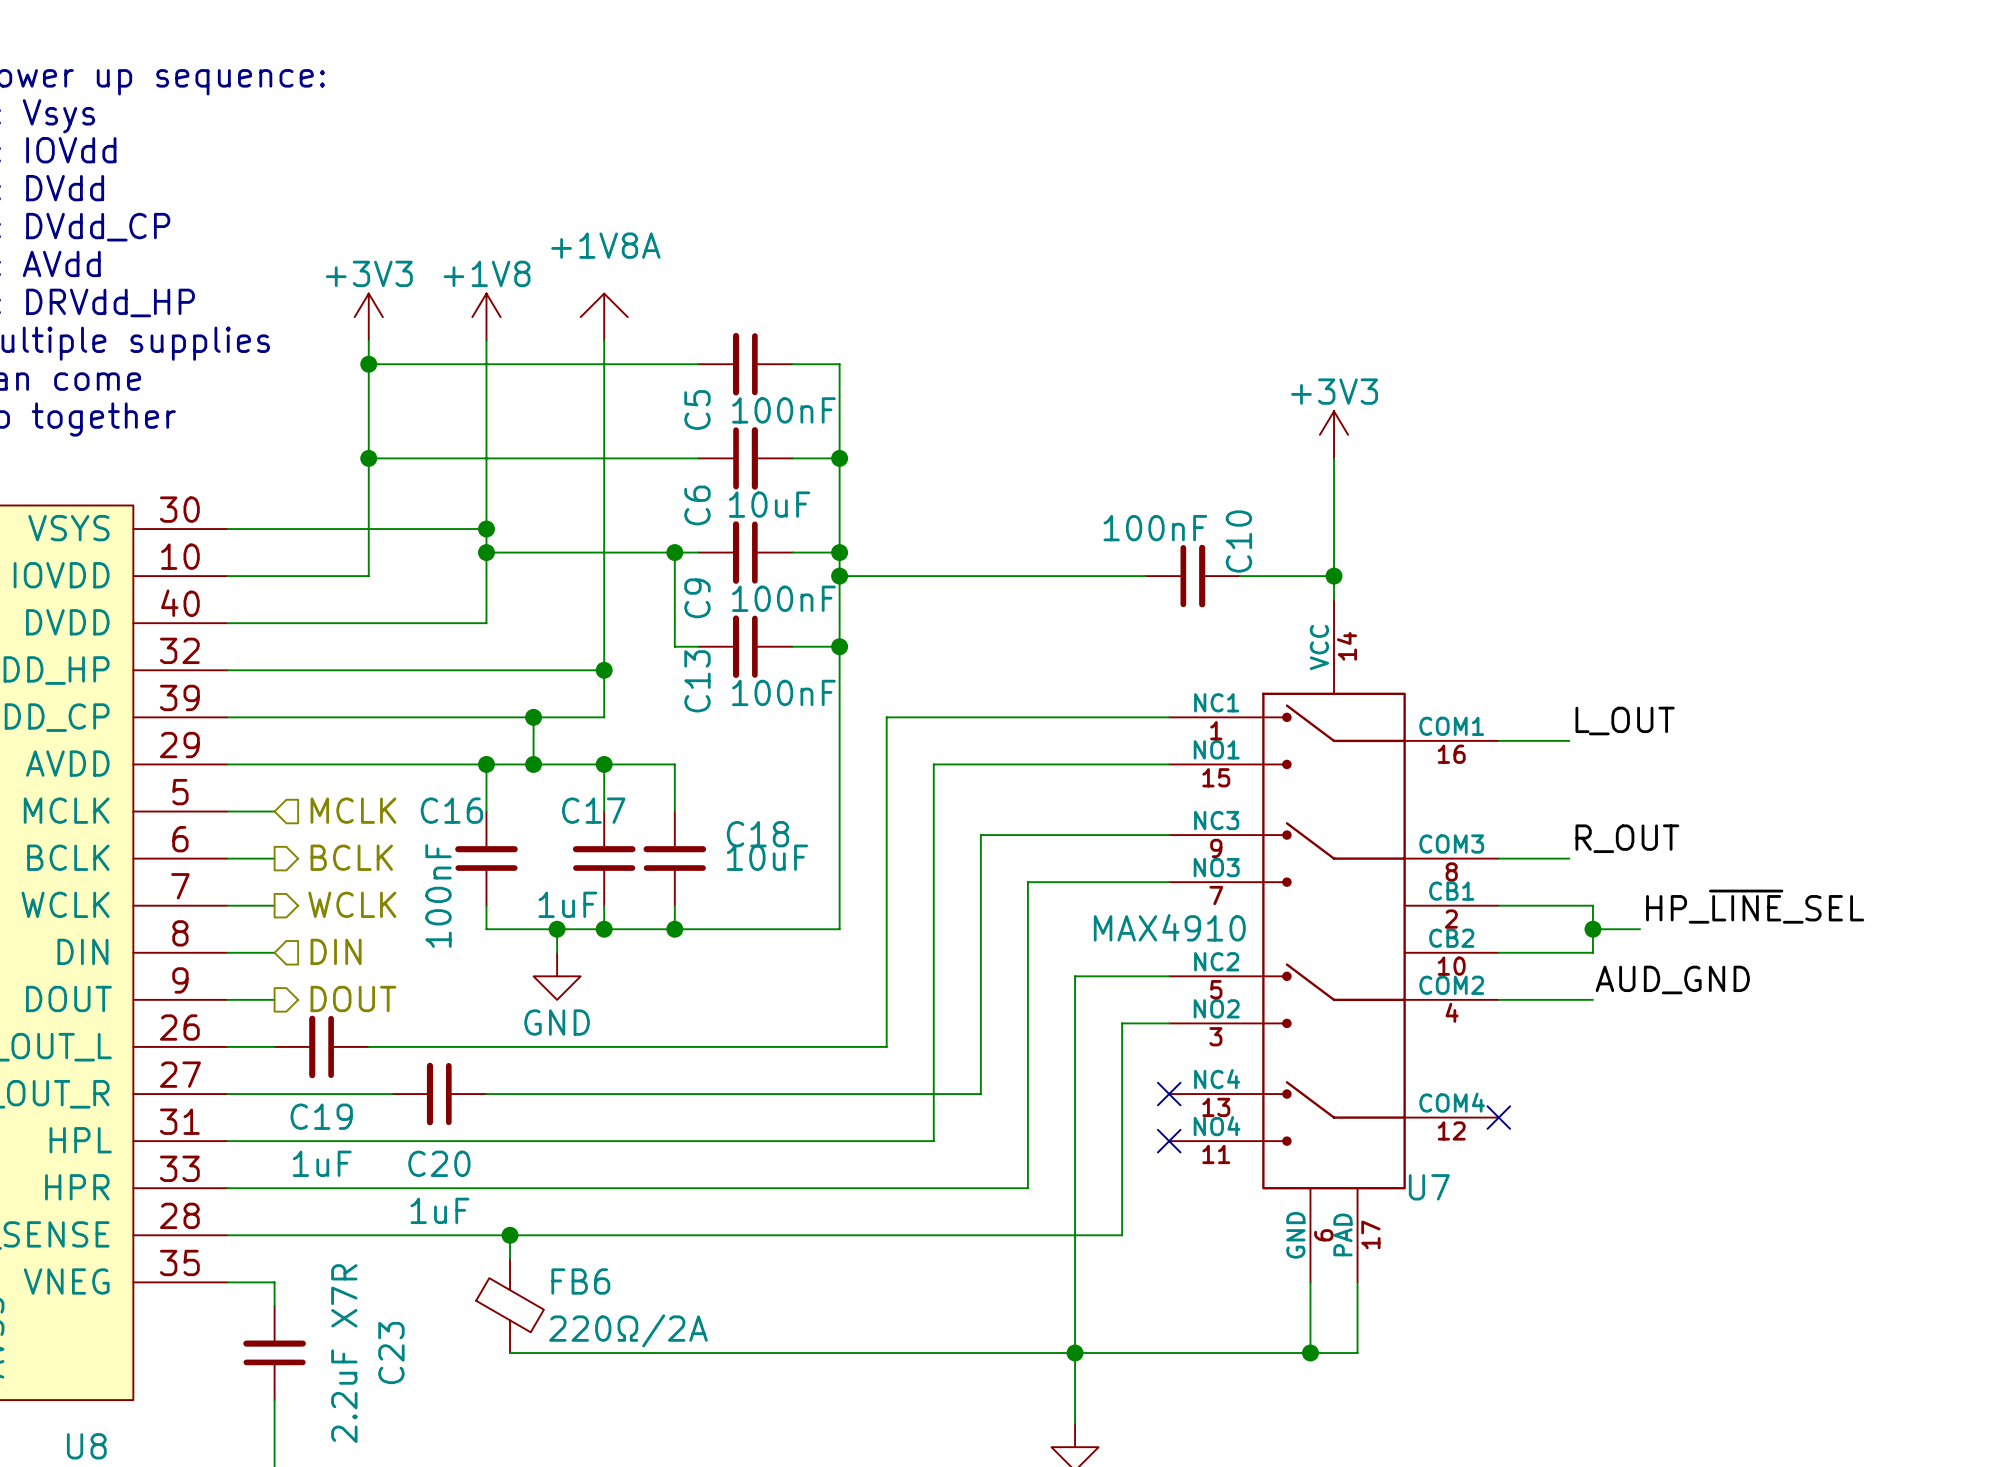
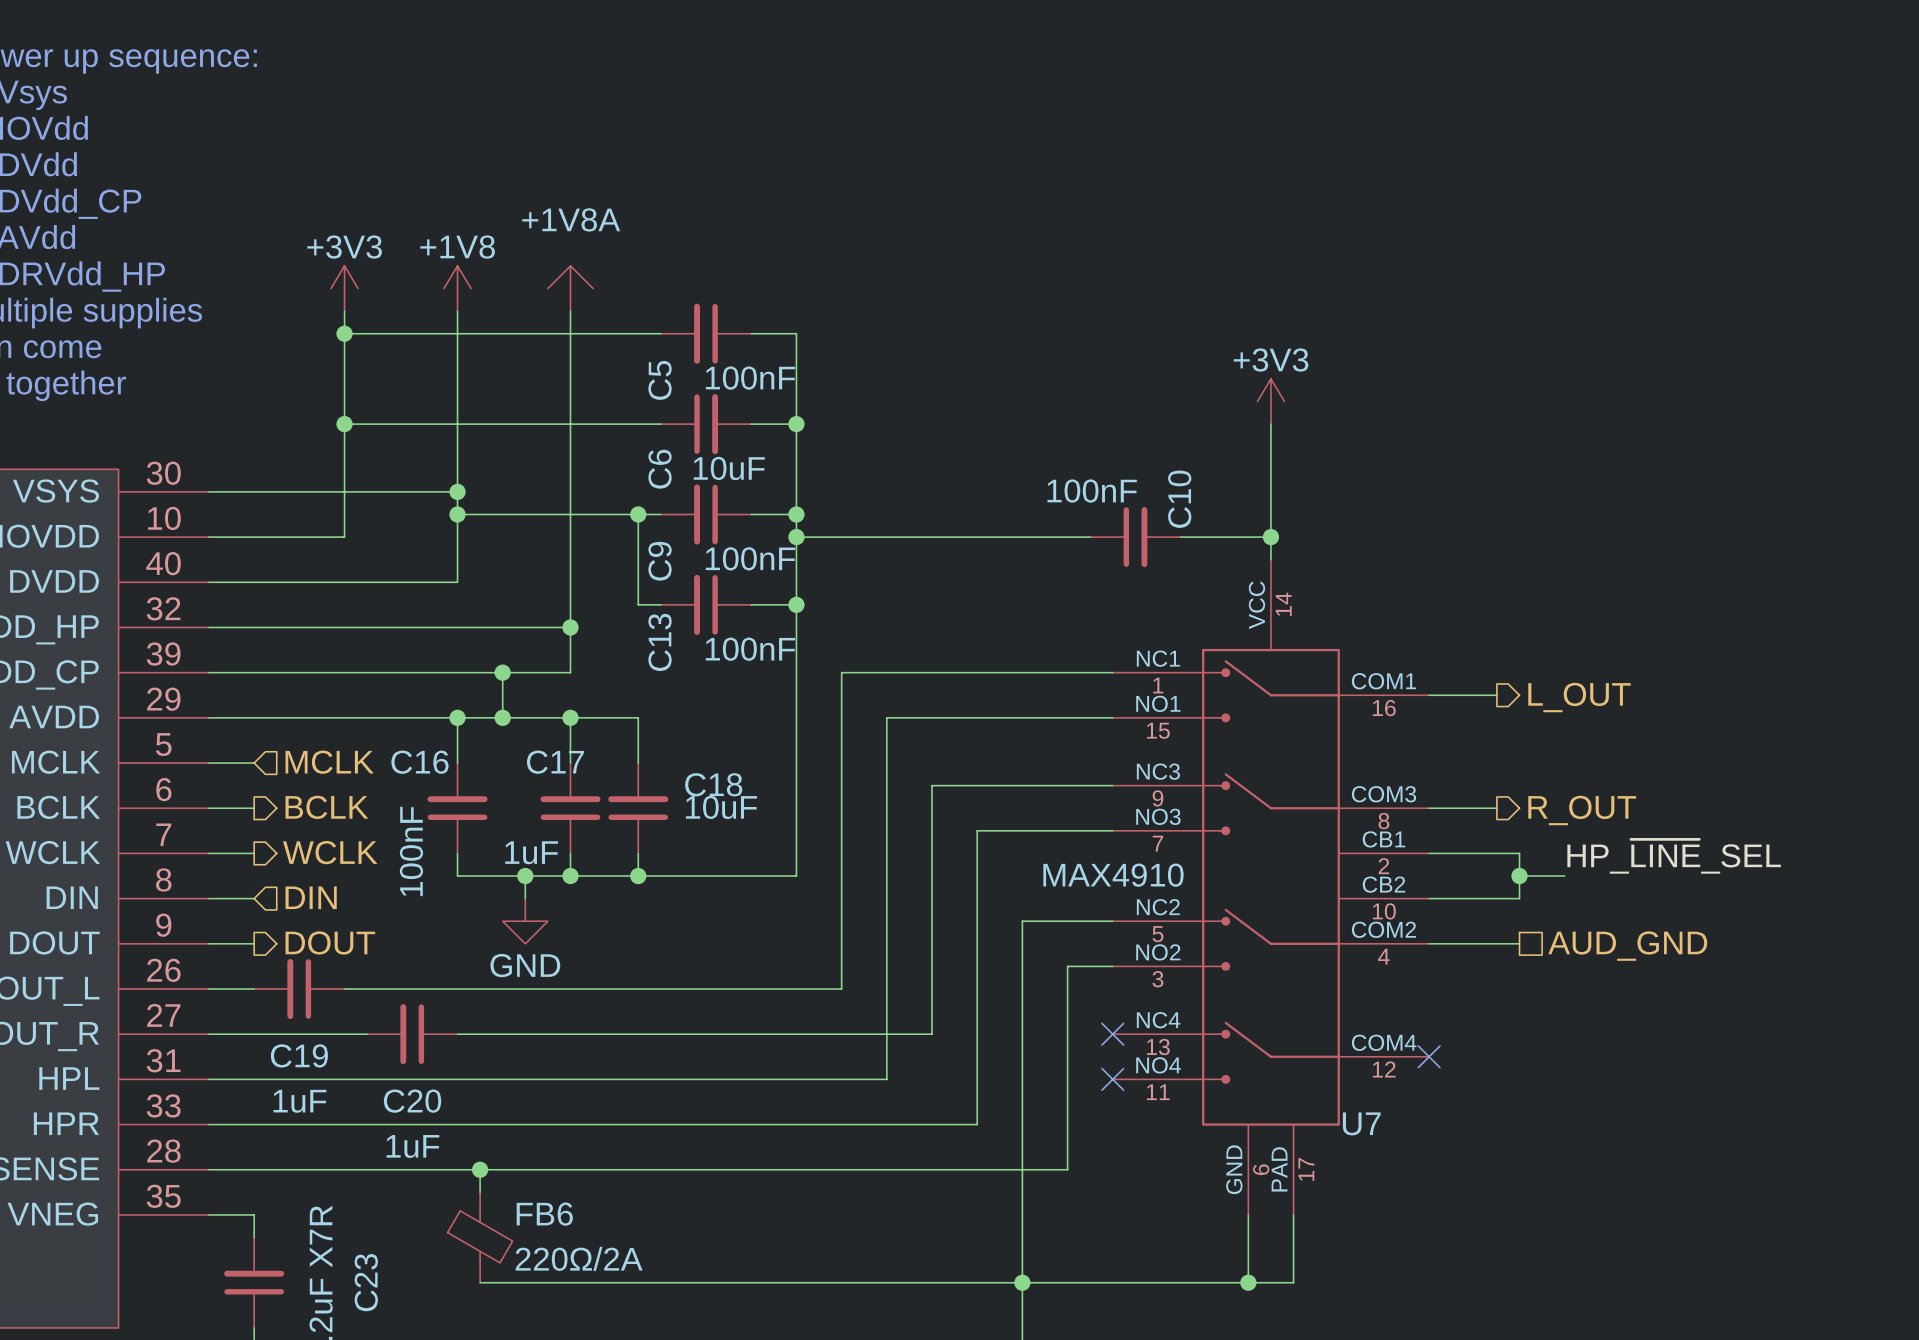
label: L_OUT (1625, 721) -> none
hierarchical label: none -> L_OUT (1579, 697)
label: R_OUT (1627, 838) -> none
hierarchical label: none -> R_OUT (1582, 810)
label: AUD_GND (1672, 979) -> none
hierarchical label: none -> AUD_GND (1627, 946)

